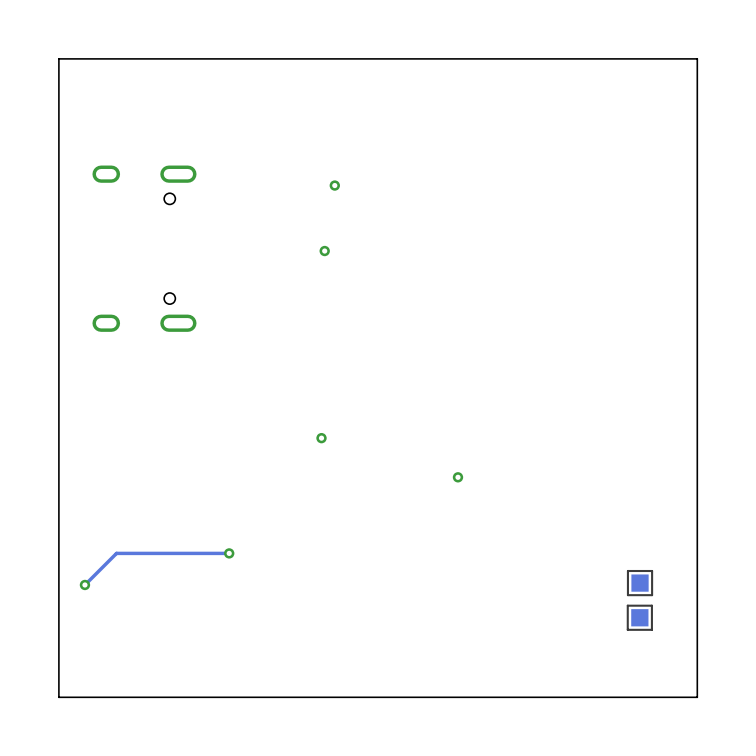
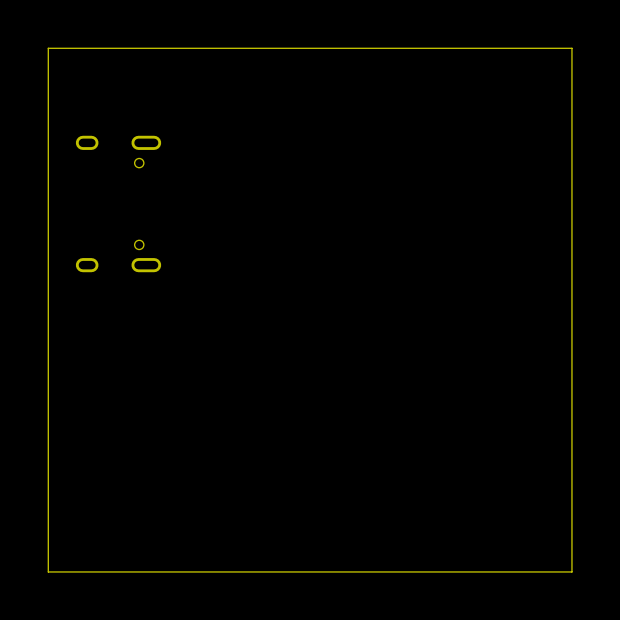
via: (334, 185) -> none
via: (324, 251) -> none
via: (321, 438) -> none
via: (457, 477) -> none
track: (229, 553) (116, 553) (84, 584) -> none
via: (229, 553) -> none
part: (640, 583) -> none
via: (84, 584) -> none
part: (639, 617) -> none

